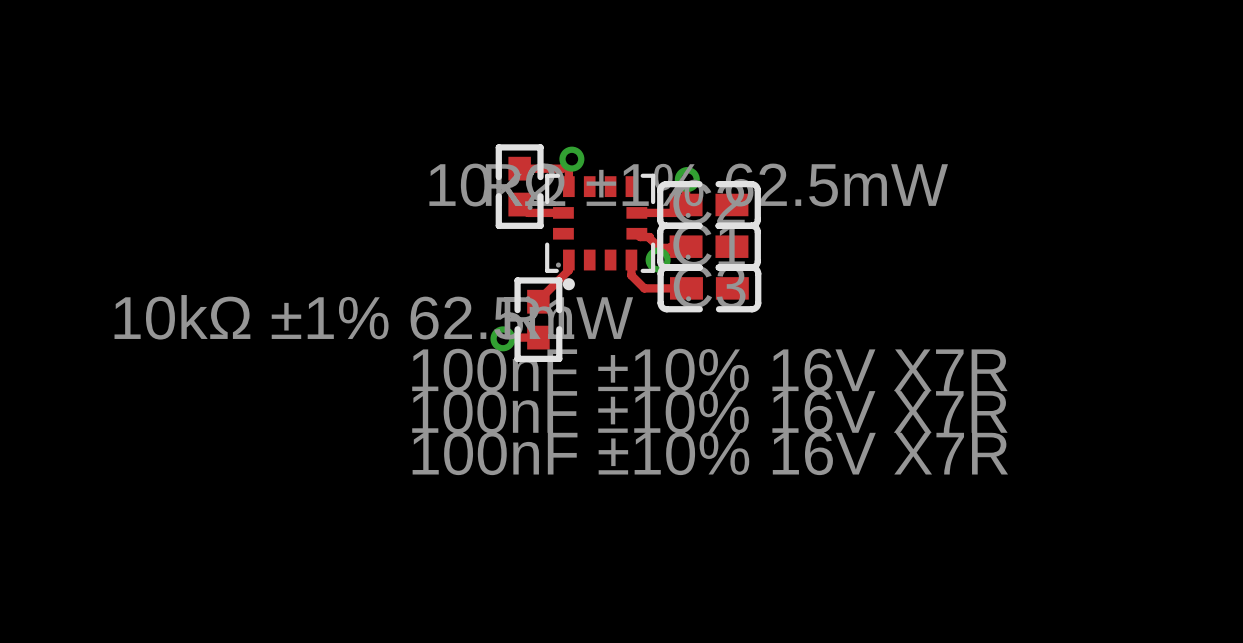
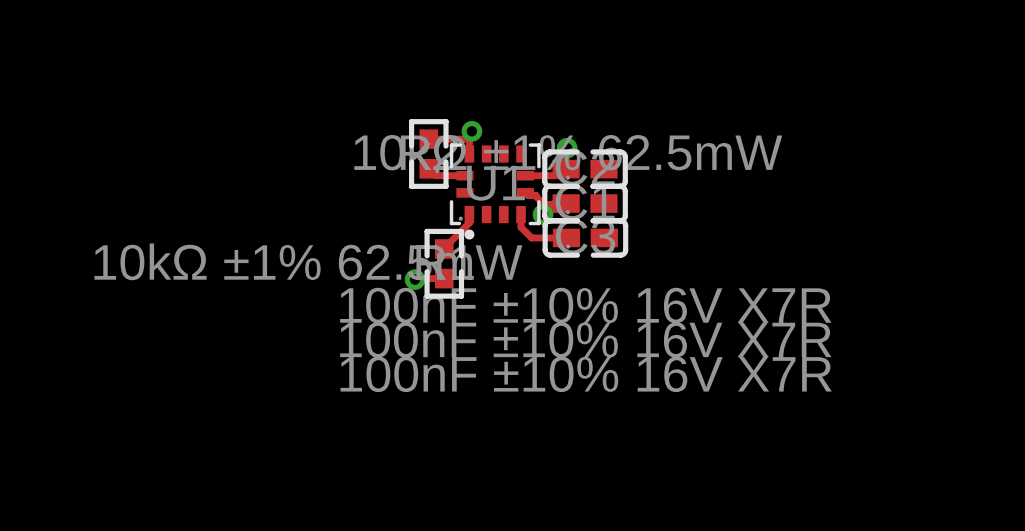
U1 name: none -> U1 (495, 183)

